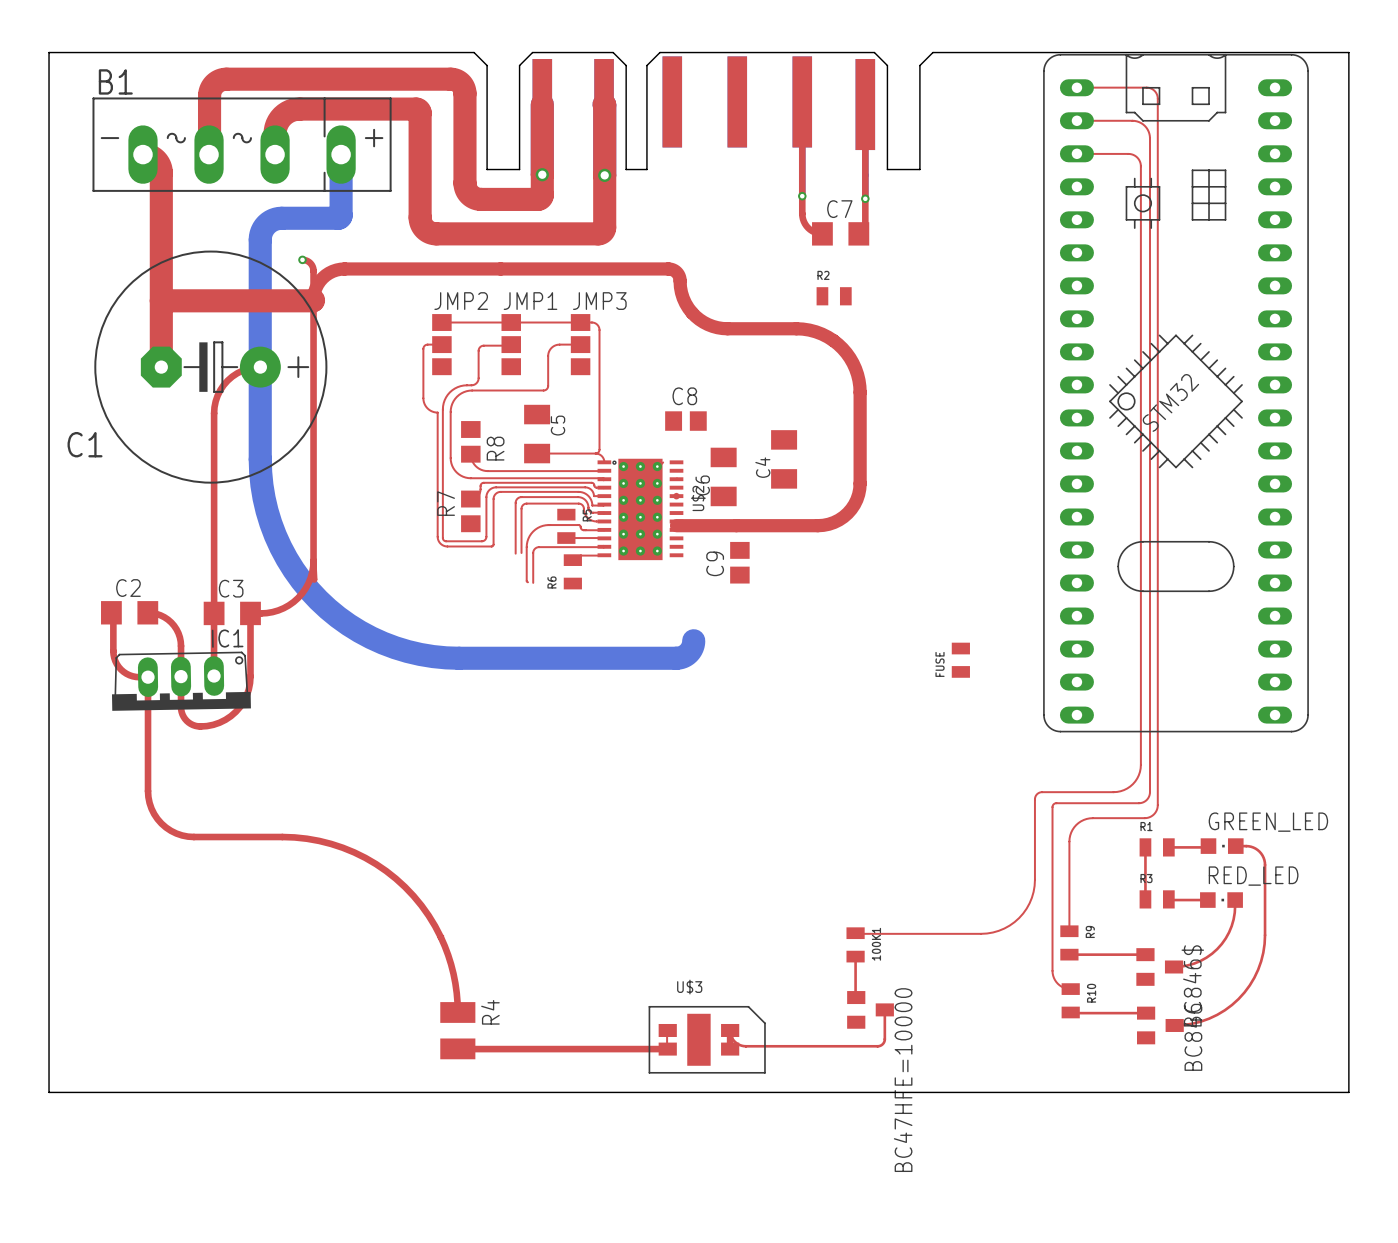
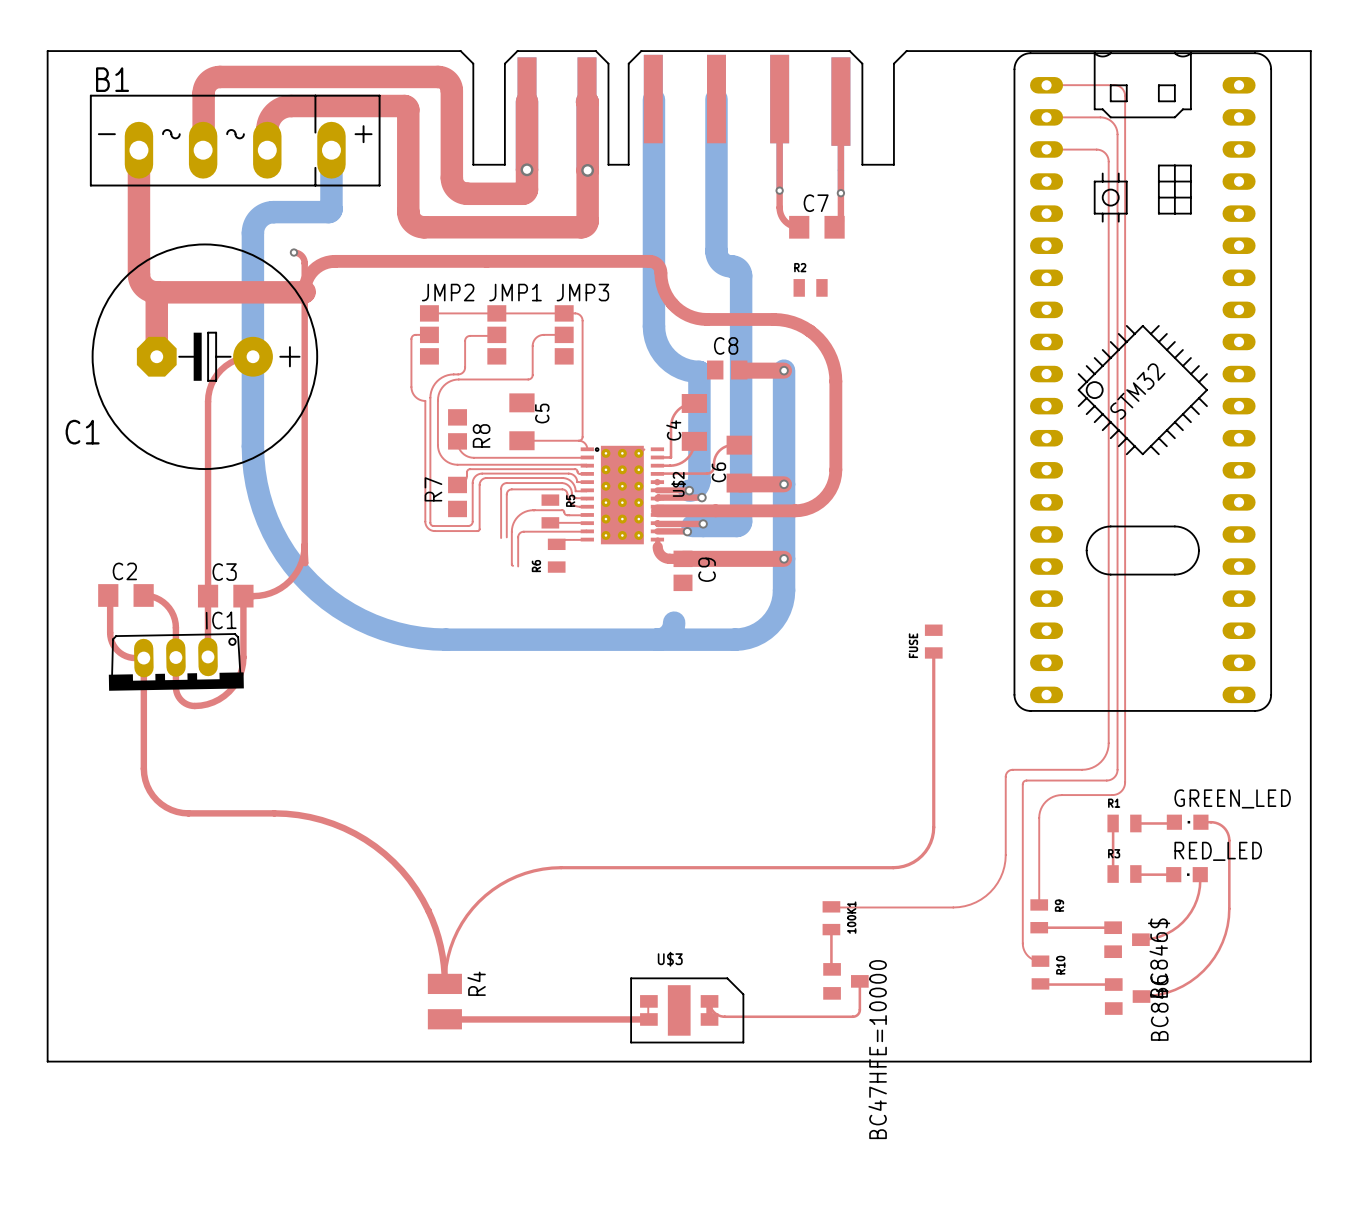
bottom track: none -> (716, 99) (716, 253) (720, 261) (737, 268) (741, 275) (741, 522) (737, 525) (691, 526) (687, 531)
bottom track: none -> (653, 99) (654, 332) (660, 349) (671, 362) (682, 368) (699, 371) (699, 481) (696, 487) (689, 490) (698, 491) (701, 497)
top track: (143, 154) (154, 158) (161, 170) (161, 300) -> (138, 150) (139, 276) (144, 287) (156, 292)
top track: none -> (739, 370) (784, 370)
bottom track: none -> (784, 370) (784, 590) (780, 609) (773, 620) (764, 629) (747, 638) (657, 639)
via: none -> (784, 370)
top track: none -> (694, 403) (680, 408) (672, 417) (670, 457) (657, 457)
C8 position: (685, 421) -> (727, 370)
top track: none -> (694, 440) (692, 450) (684, 460) (673, 465) (657, 465)
top track: none -> (738, 446) (728, 445) (719, 450) (714, 459) (713, 469) (709, 473) (657, 473)
C4 position: (784, 459) -> (694, 422)
C6 position: (723, 476) -> (739, 464)
top track: none -> (740, 482) (740, 484) (784, 484)
via: none -> (784, 484)
top track: none -> (657, 490) (689, 490)
via: none -> (689, 490)
top track: none -> (701, 497) (657, 498)
via: none -> (701, 497)
top track: none -> (657, 523) (703, 523)
via: none -> (703, 523)
top track: none -> (657, 531) (687, 531)
via: none -> (687, 531)
top track: none -> (657, 539) (659, 552) (668, 558) (784, 558)
C9 position: (739, 562) -> (683, 570)
C9 name position: C9 (715, 563) -> C9 (707, 569)
via: none -> (784, 558)
top track: none -> (933, 652) (933, 832) (928, 847) (917, 859) (908, 864) (893, 867) (561, 867) (533, 870) (500, 884) (472, 908) (453, 939) (448, 956) (444, 983)

